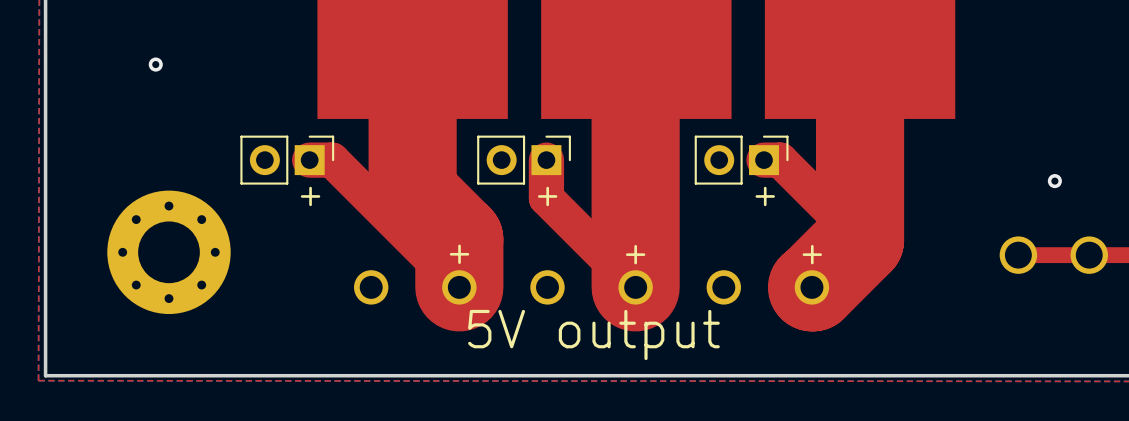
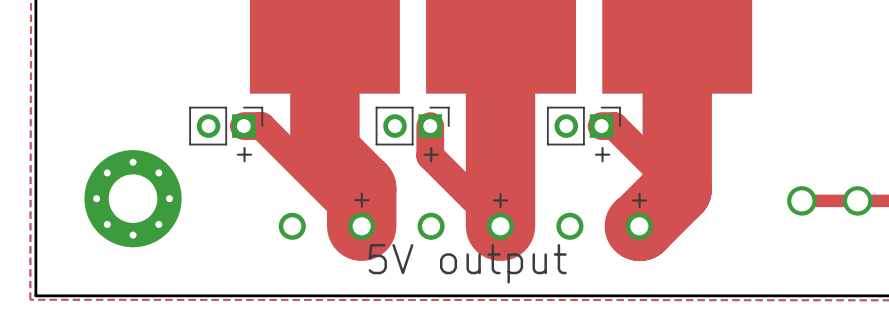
via: (155, 64) -> none
via: (1054, 181) -> none

